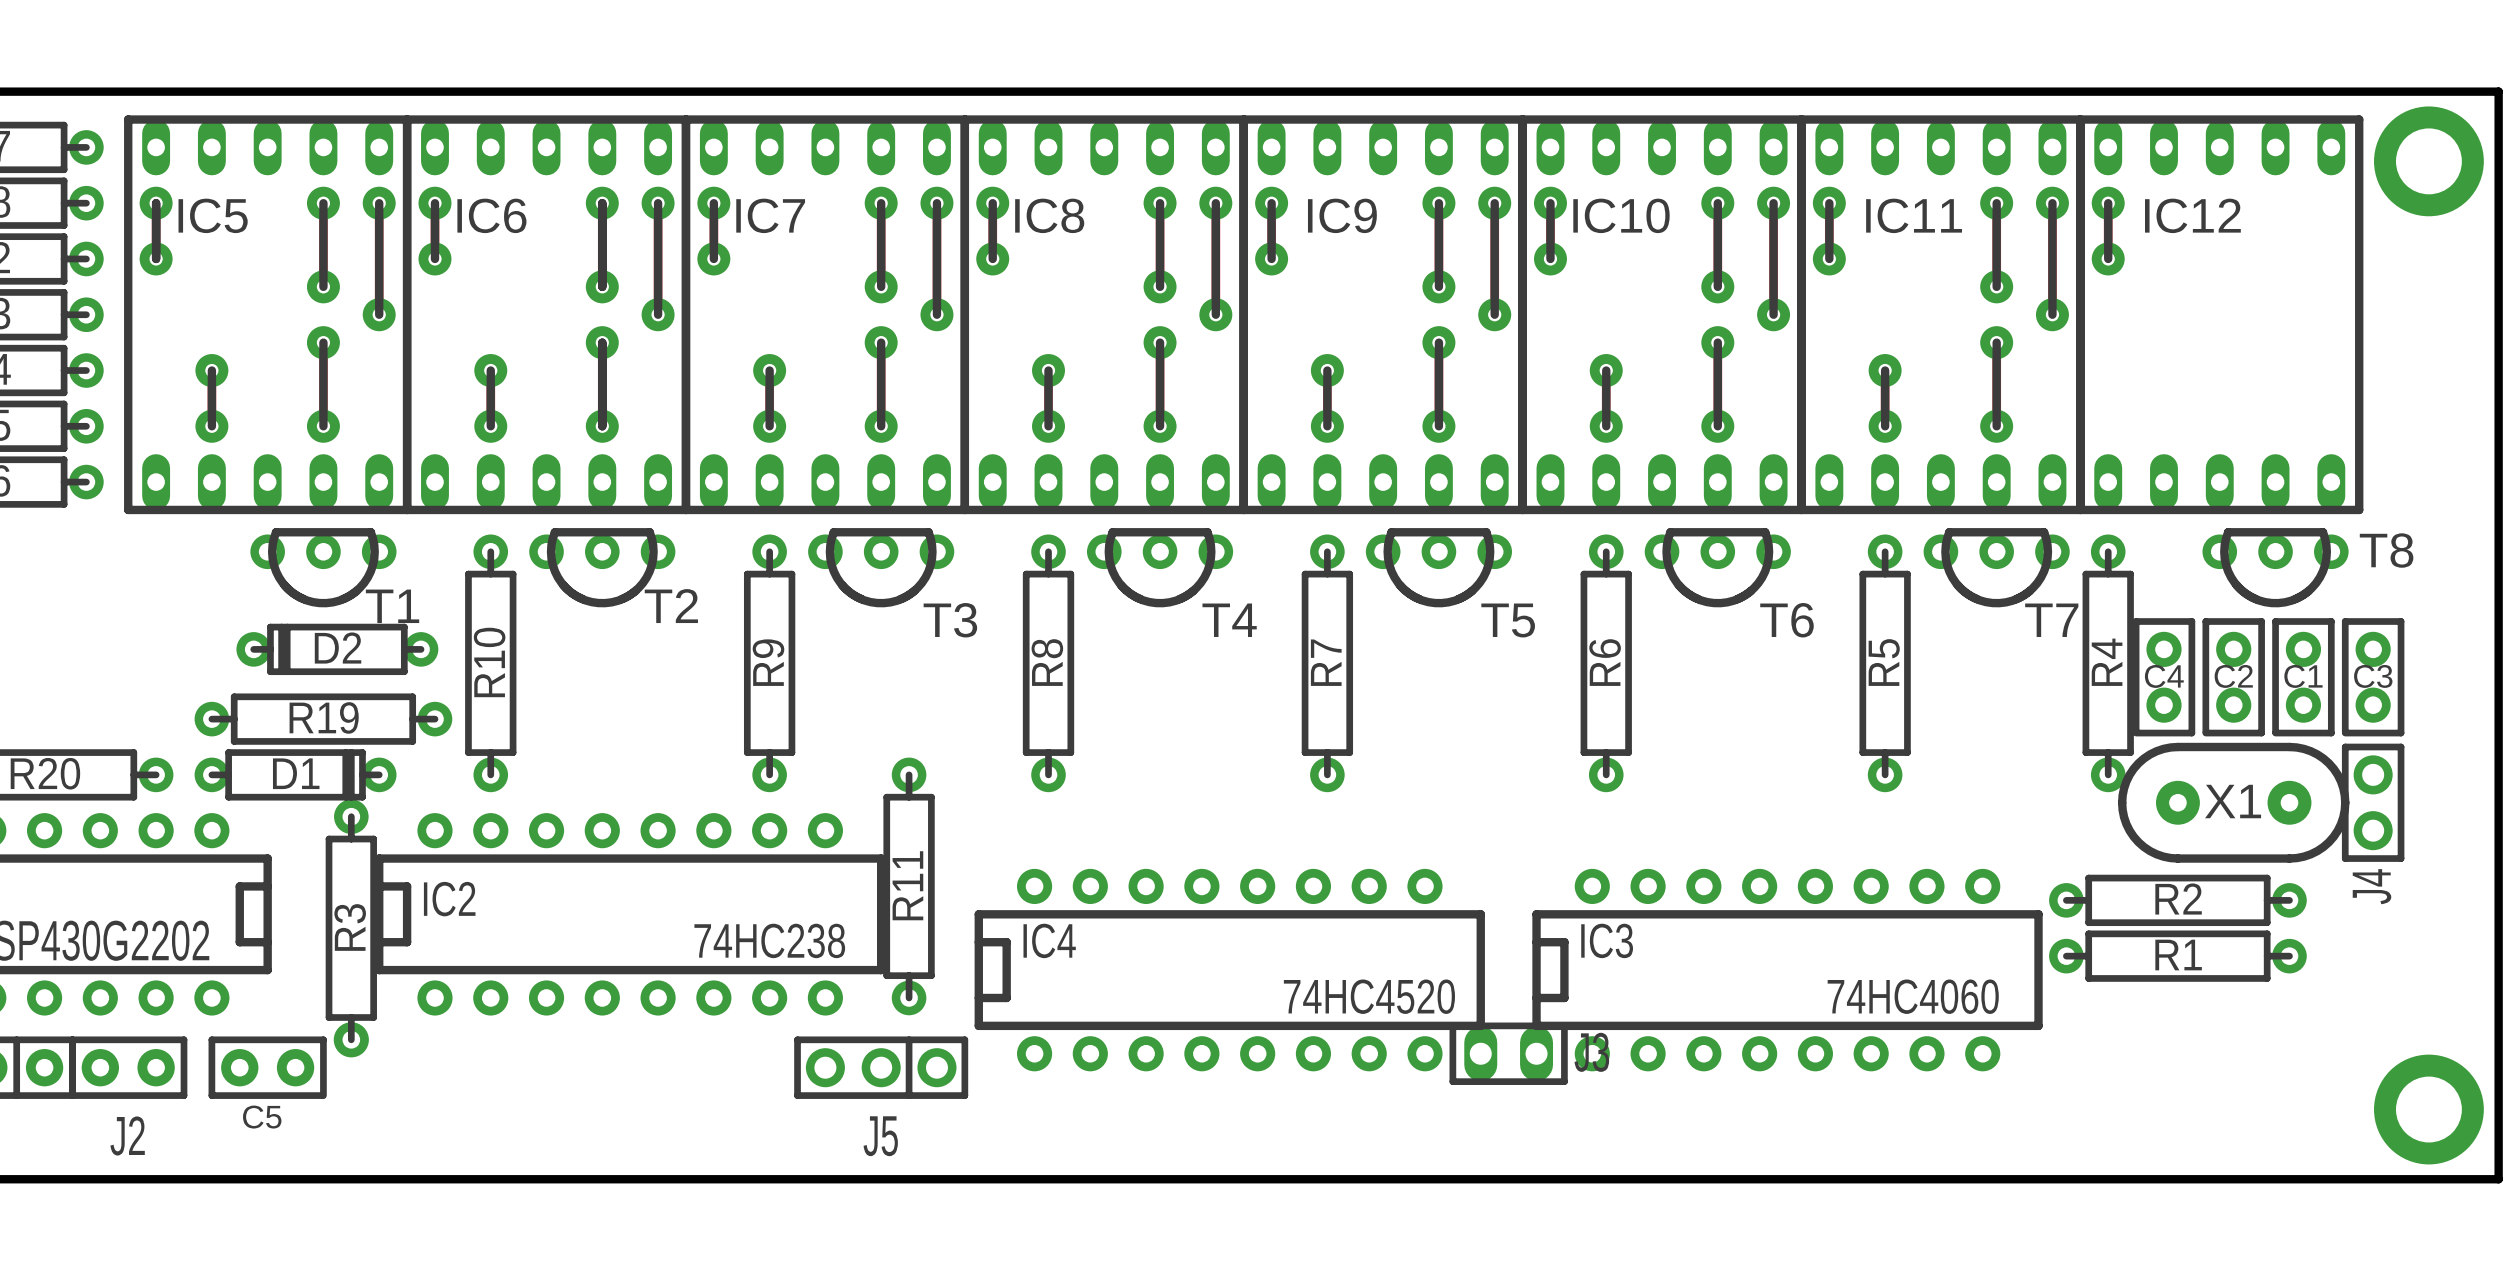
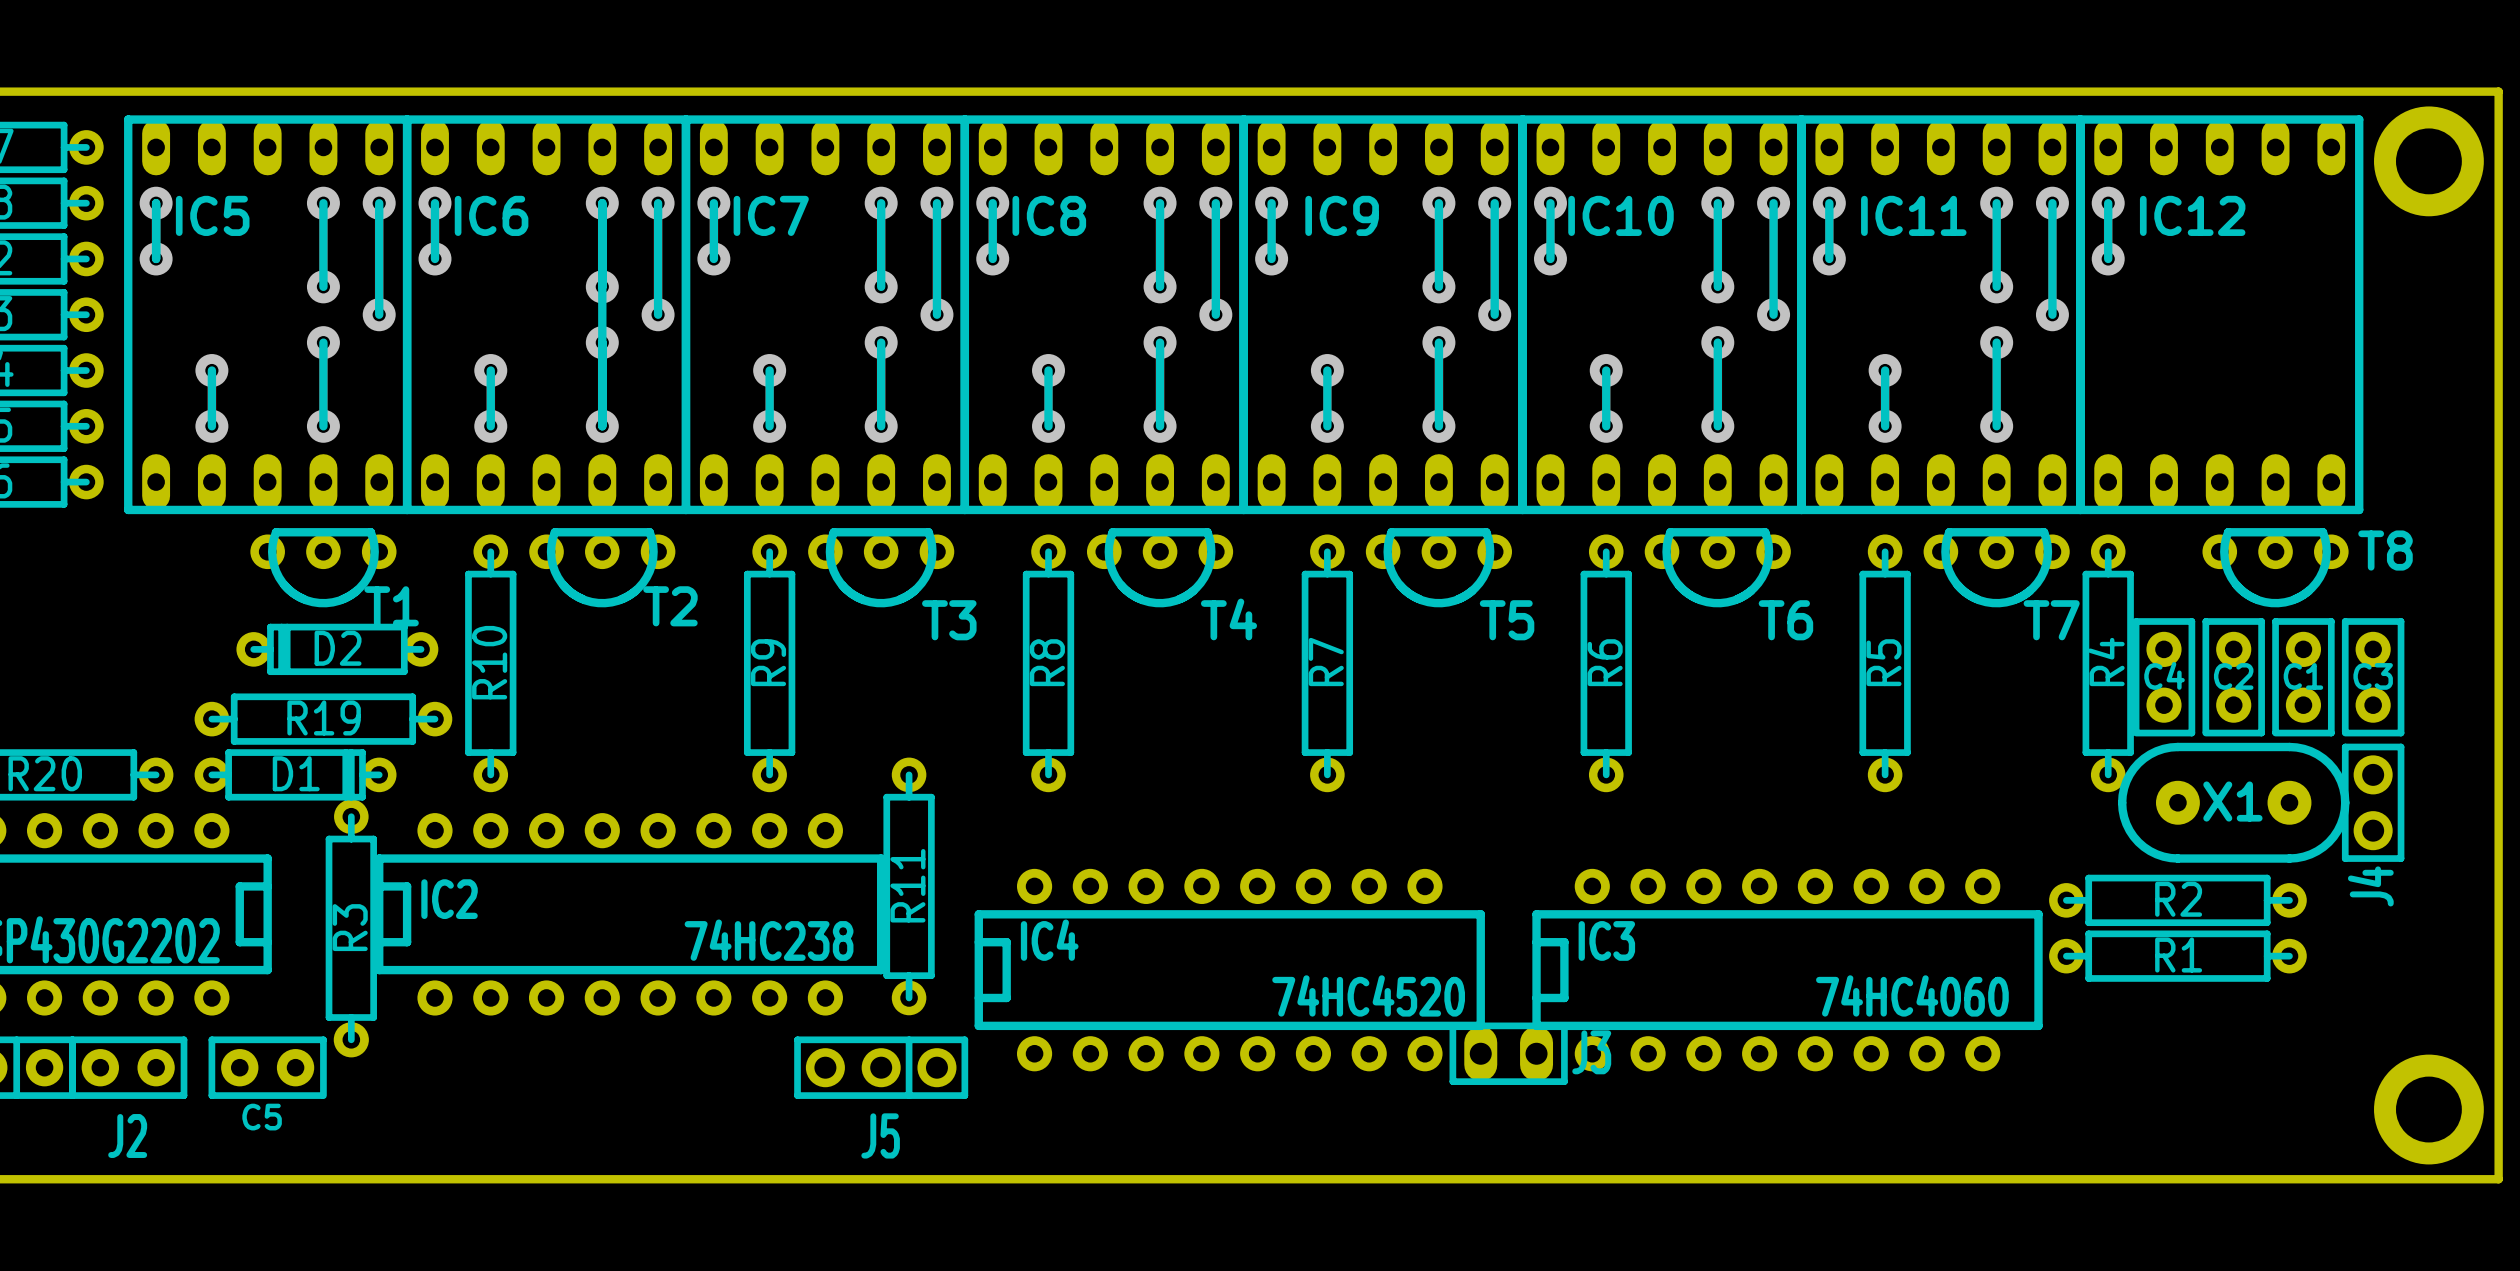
line: none -> (602, 286) (602, 342)

